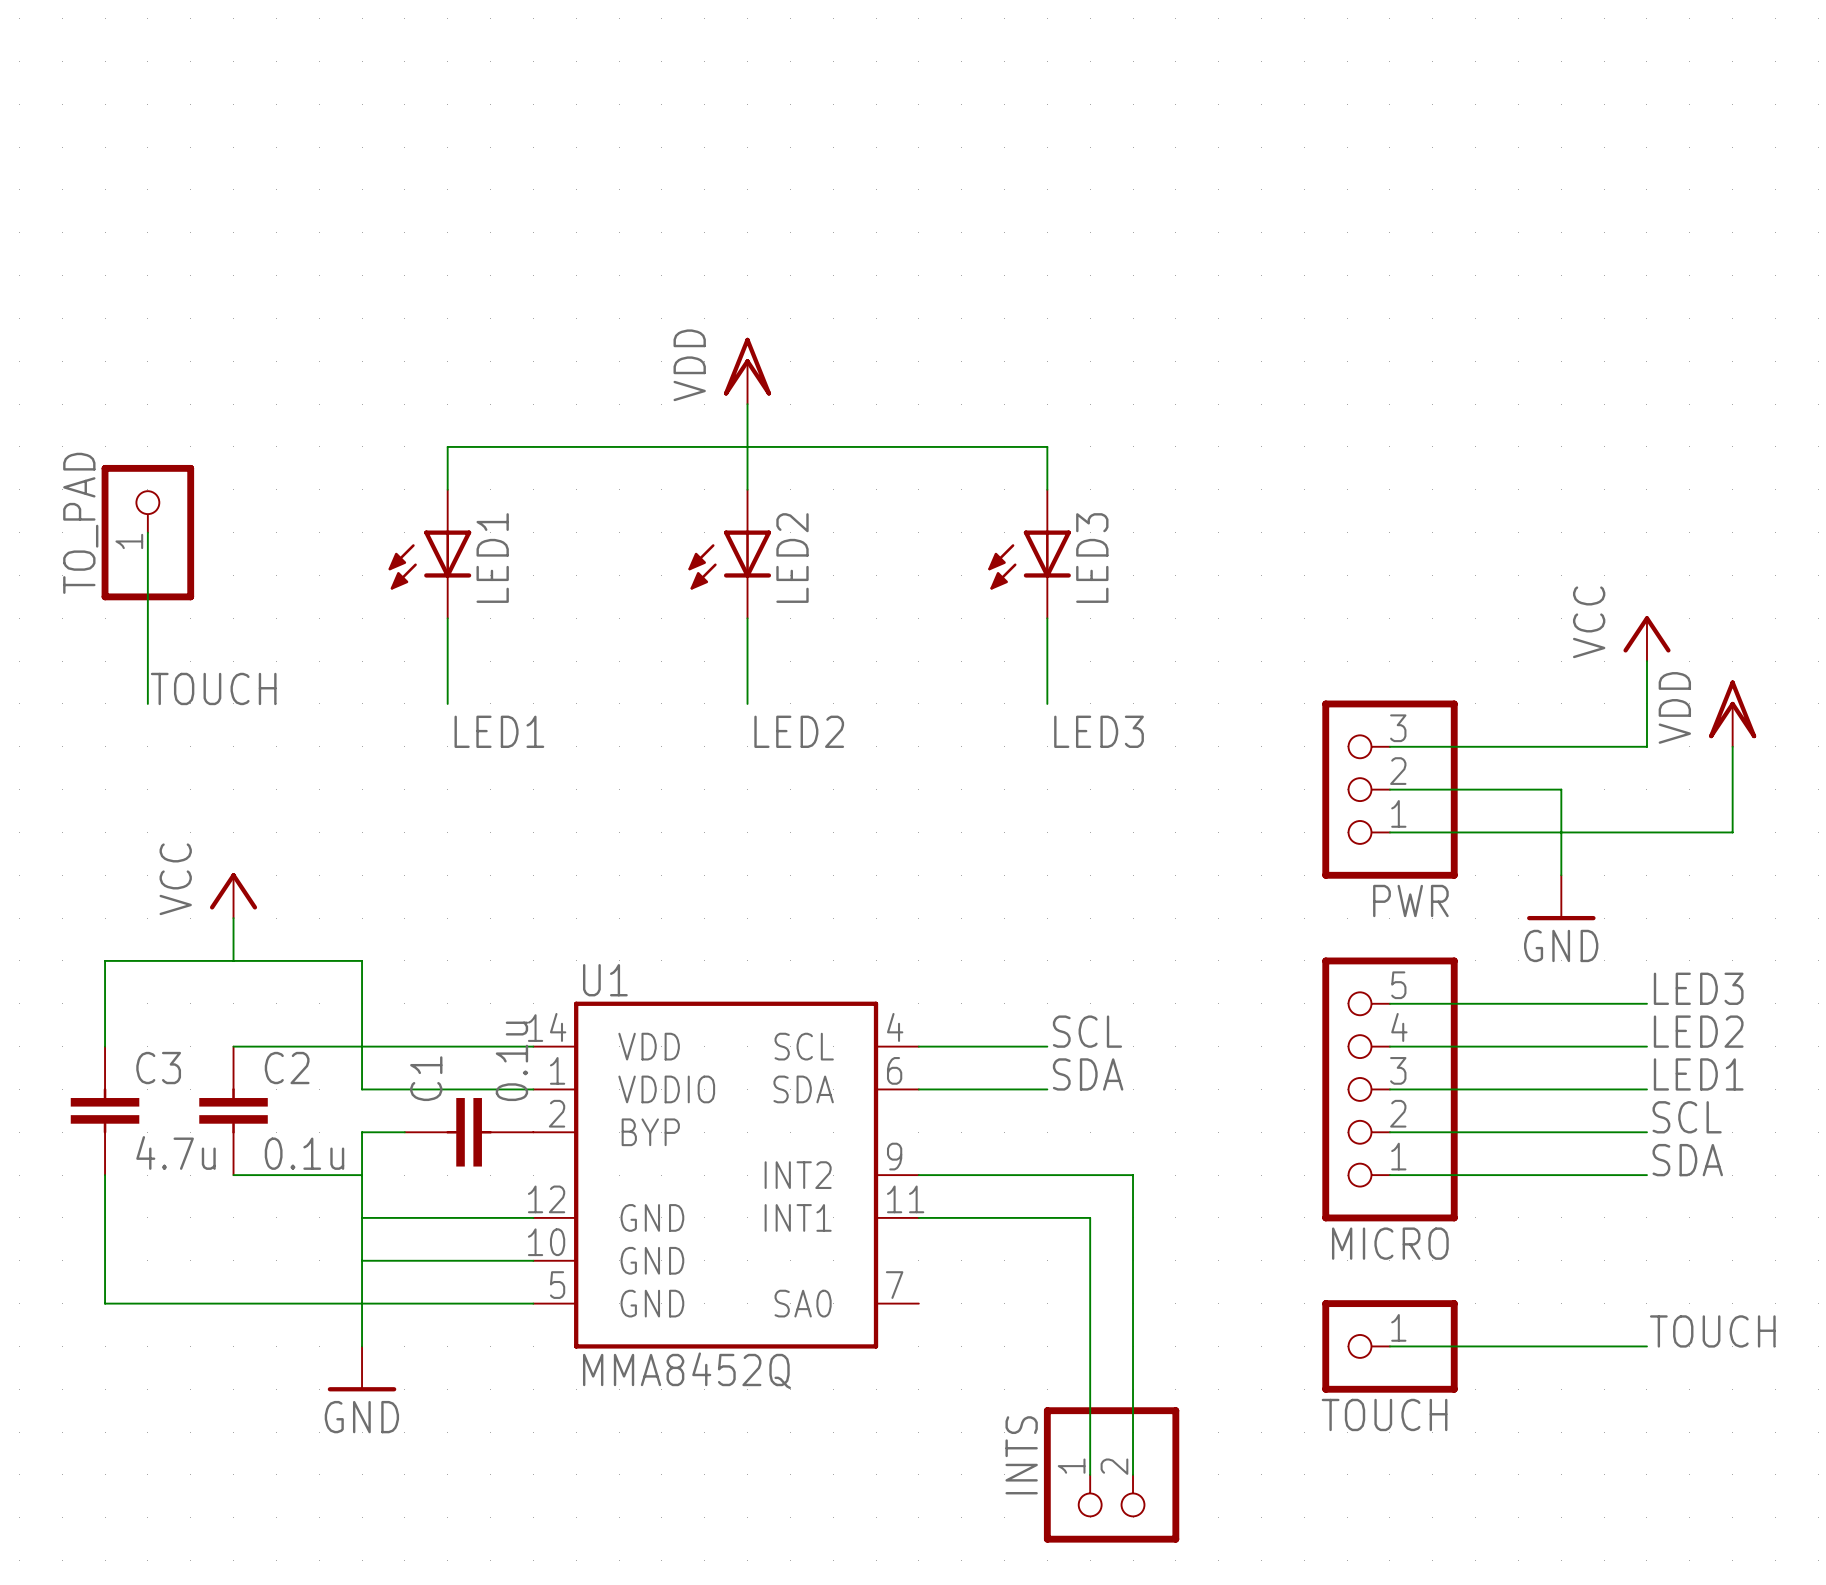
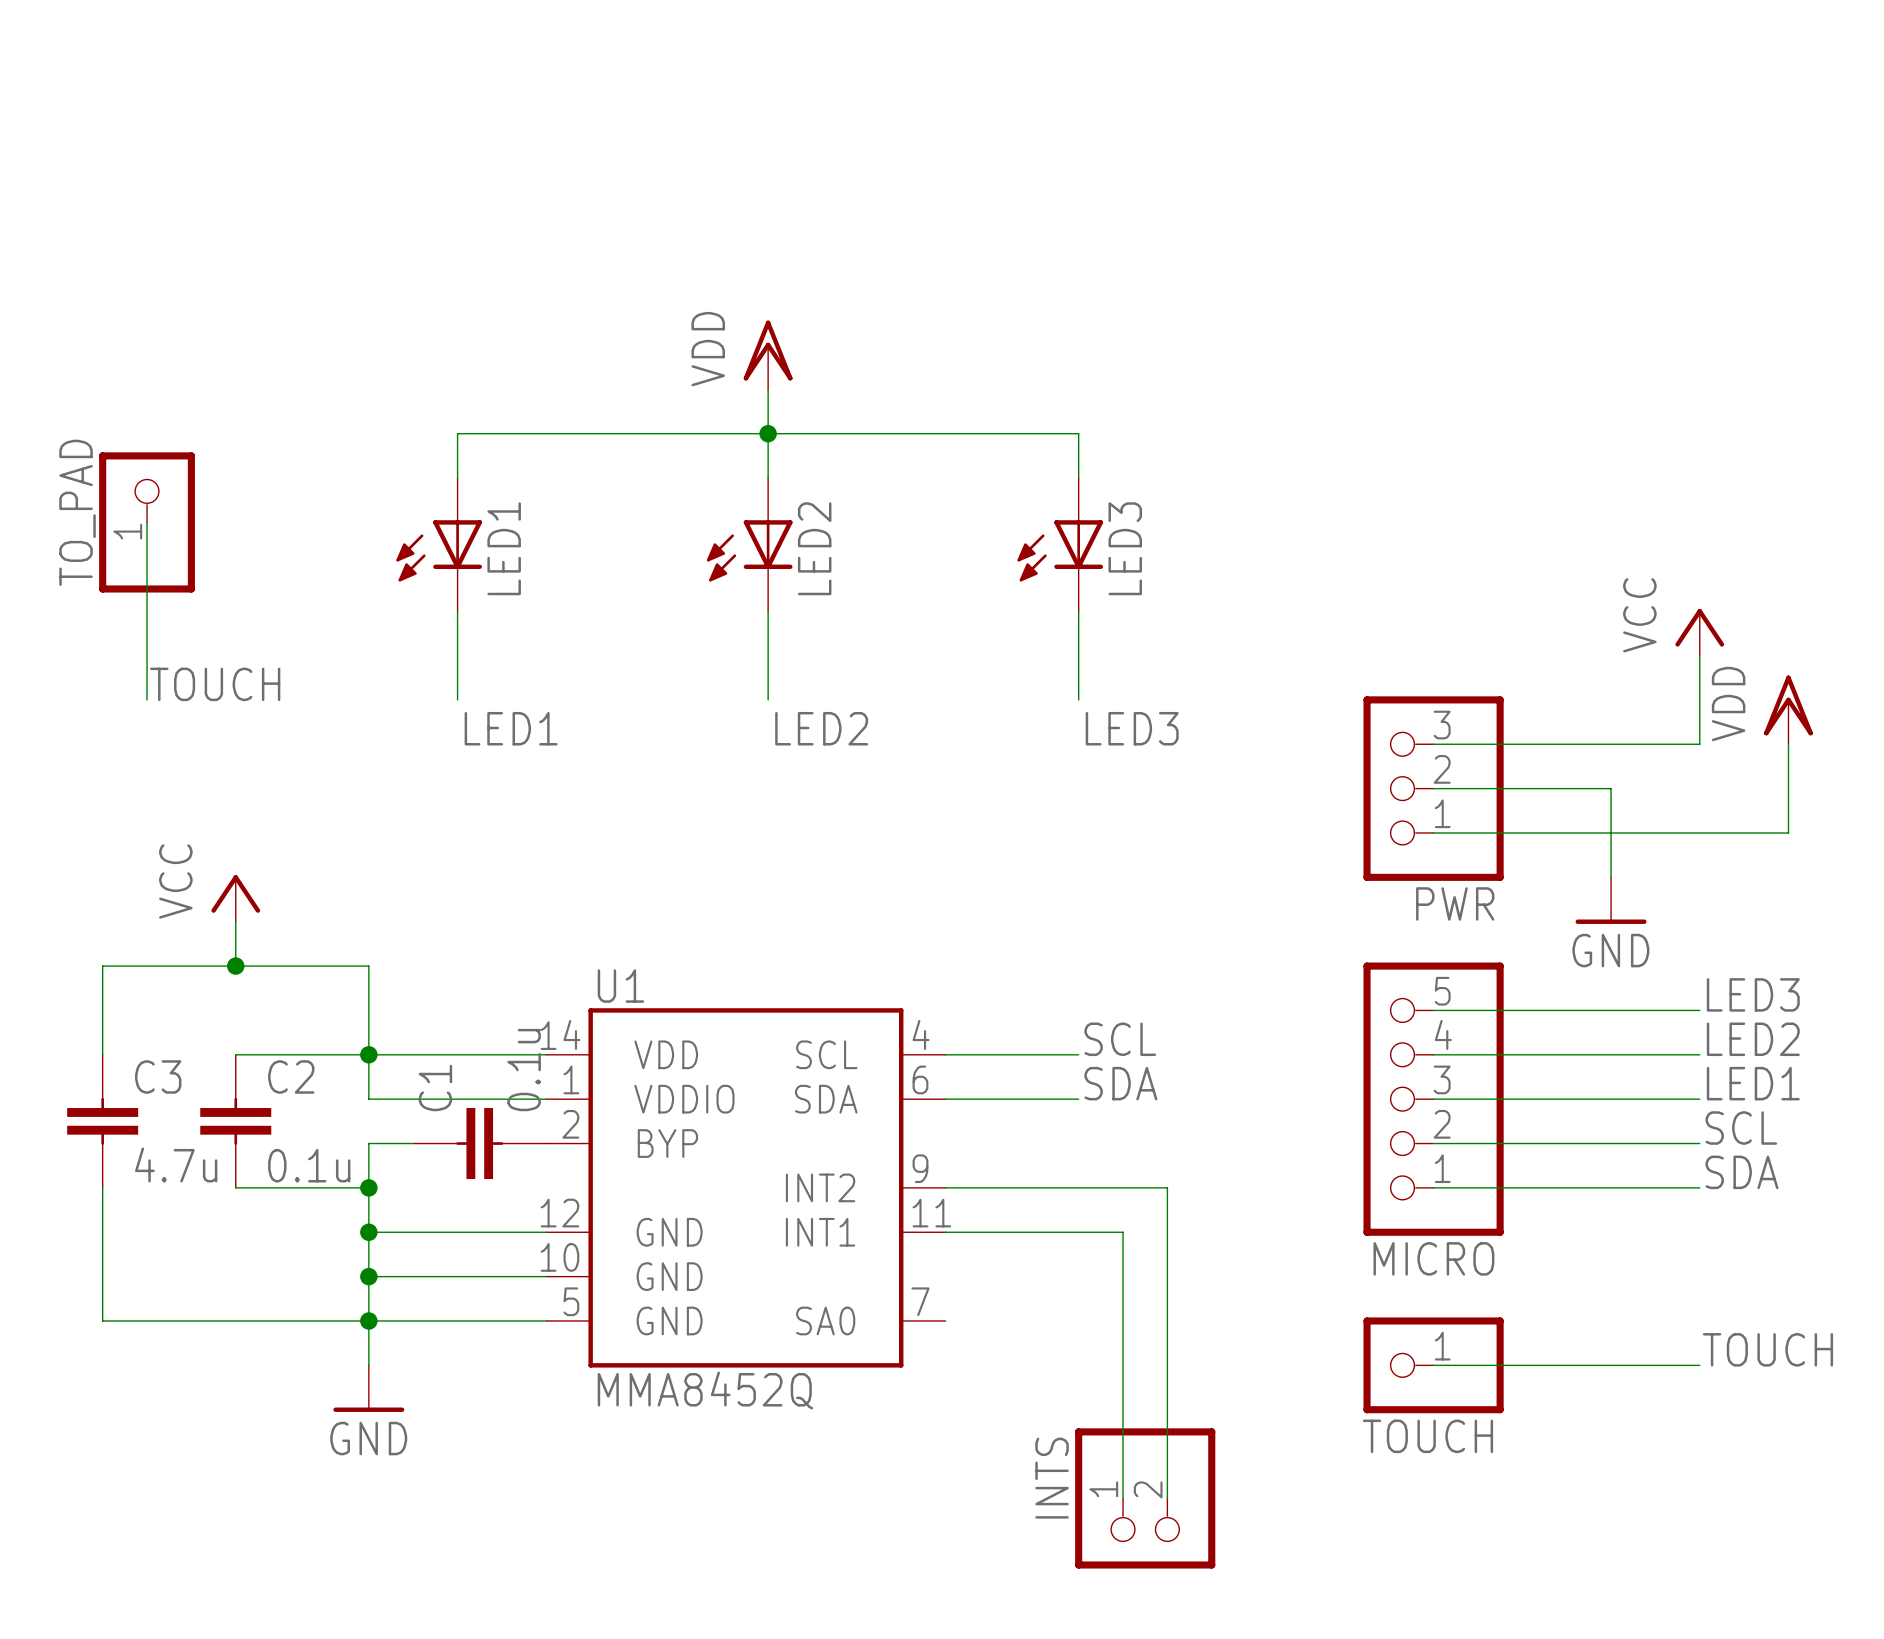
junction: none -> (768, 433)
junction: none -> (235, 966)
junction: none -> (368, 1054)
junction: none -> (368, 1187)
junction: none -> (368, 1232)
junction: none -> (368, 1276)
junction: none -> (368, 1320)

